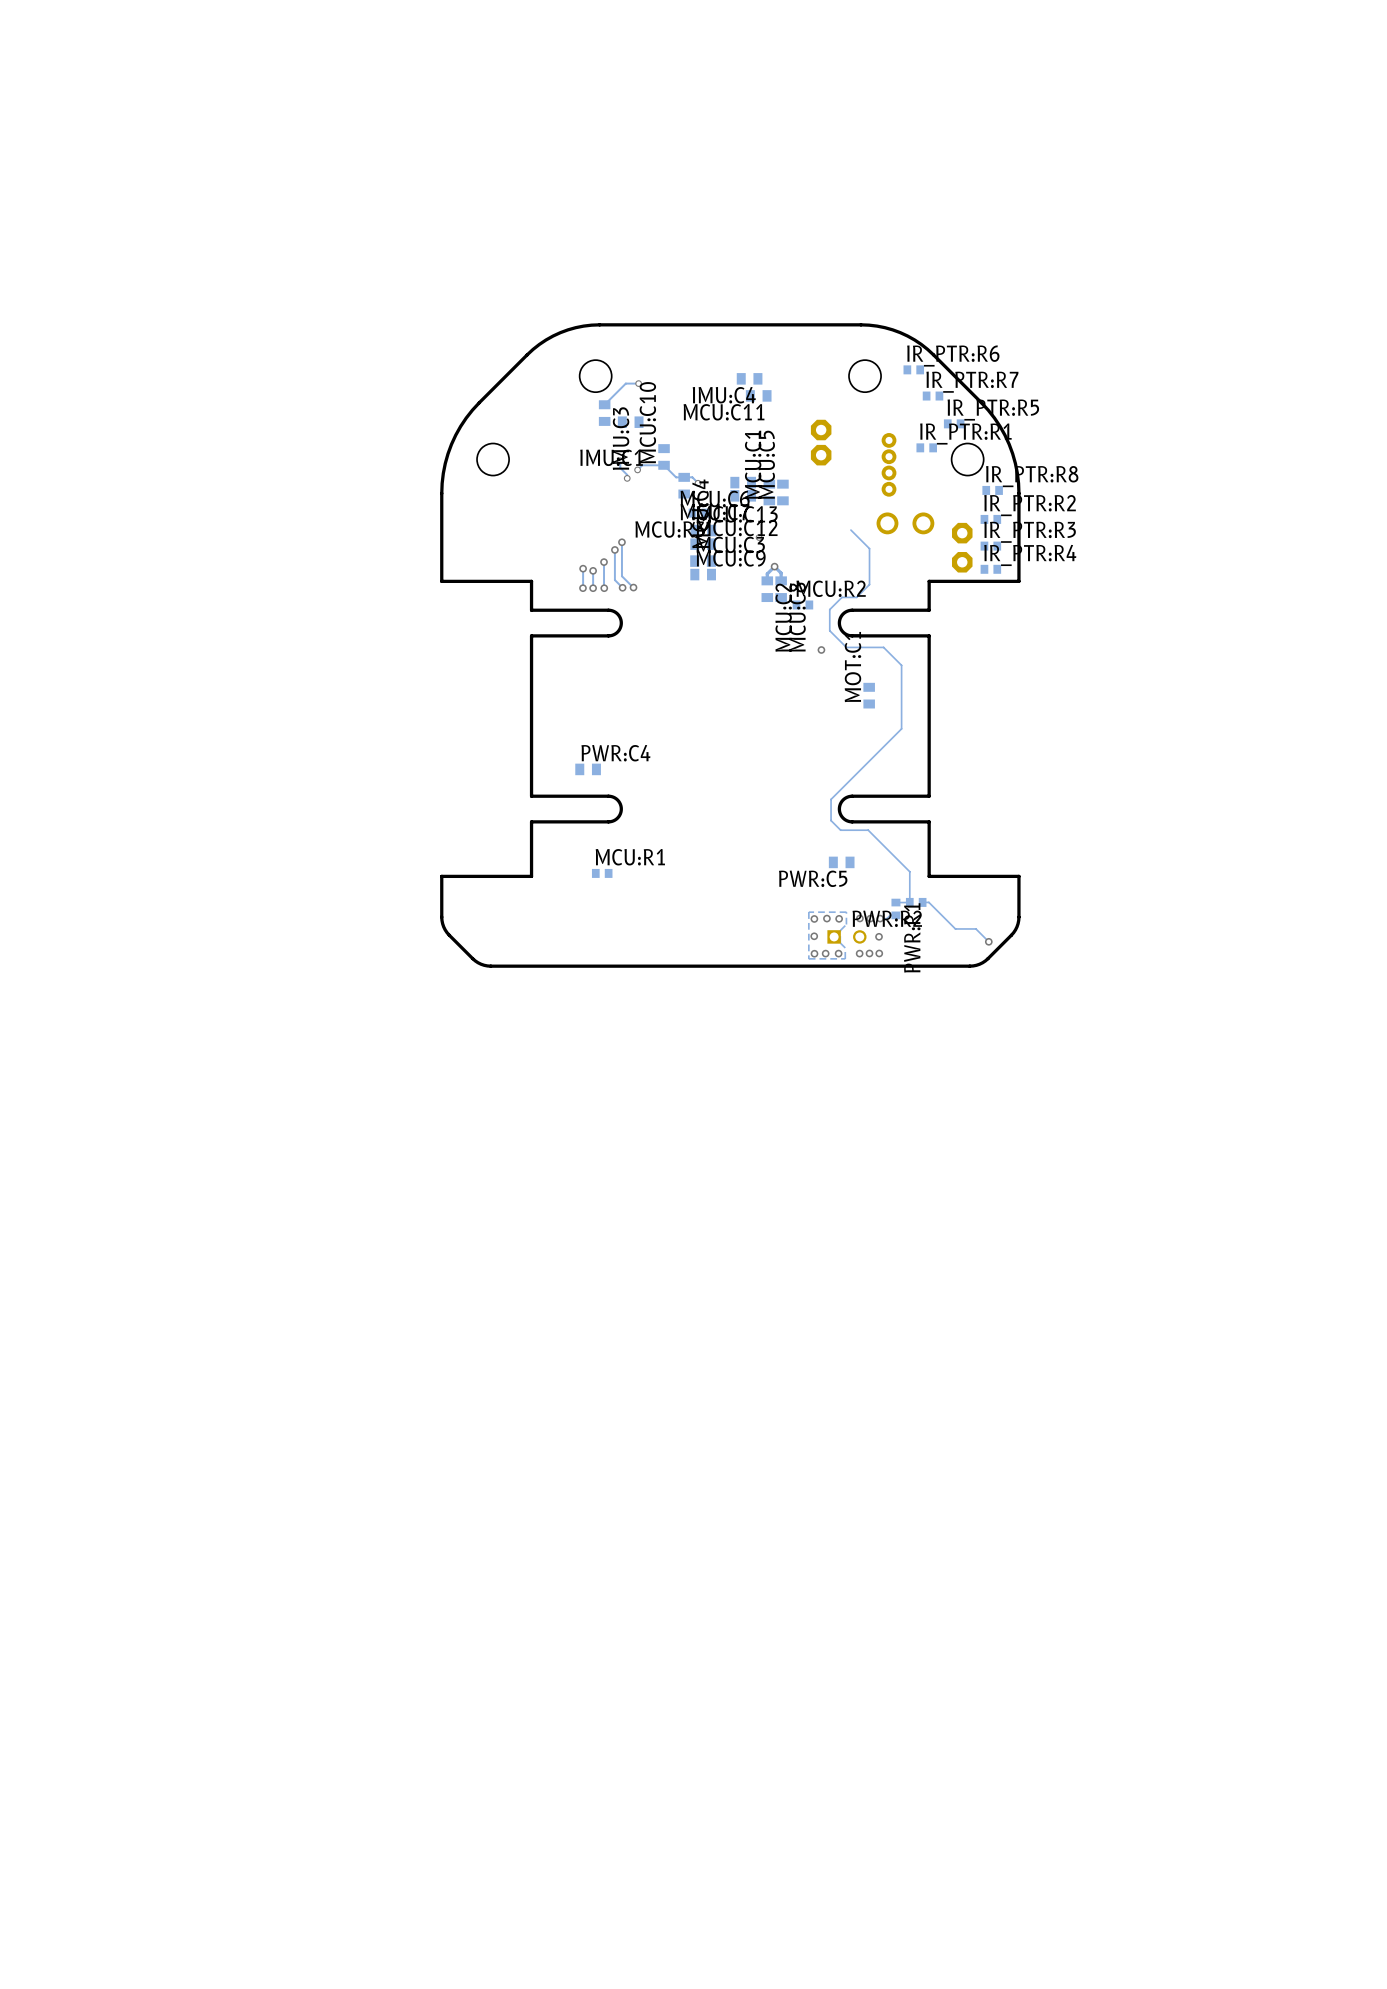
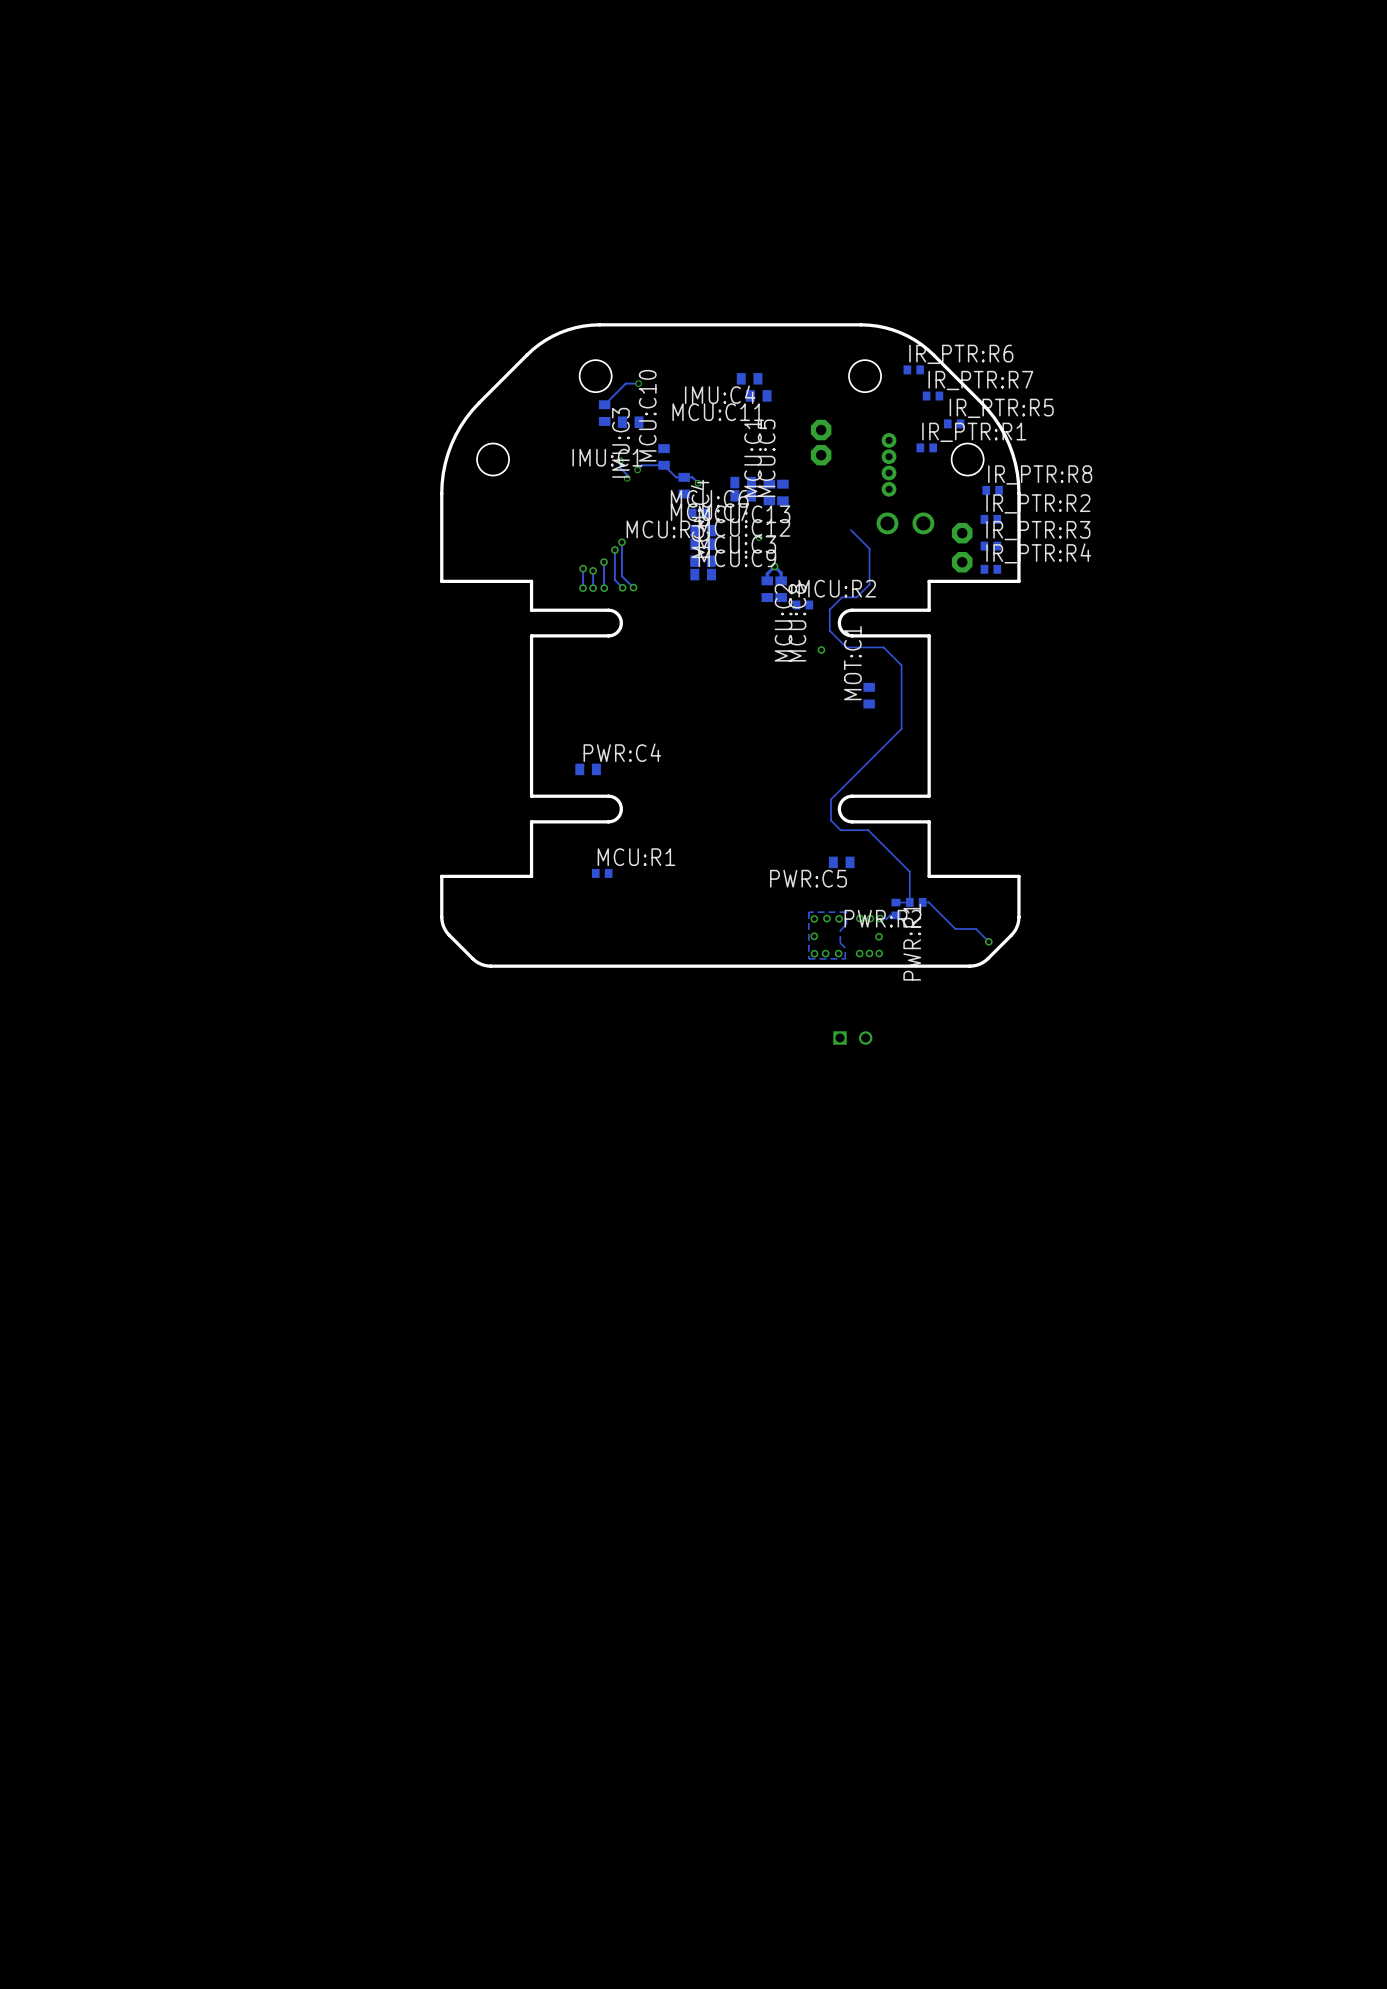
part position: (846, 936) -> (852, 1038)

